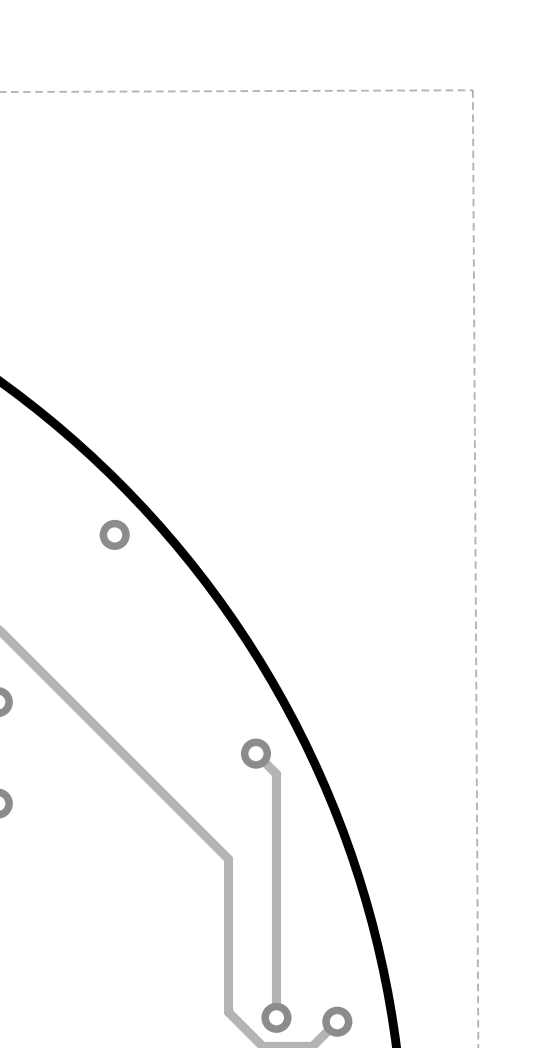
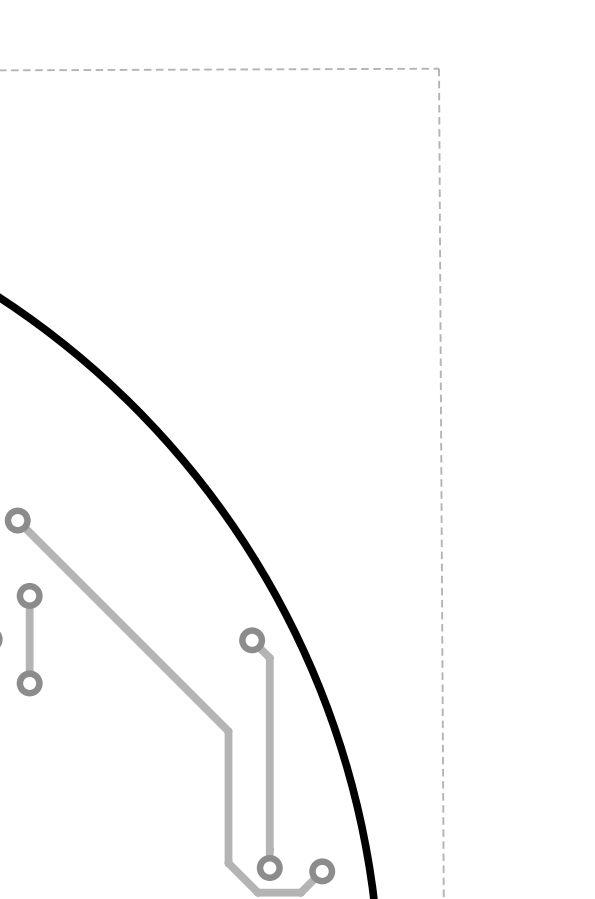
via: (114, 534) -> none

